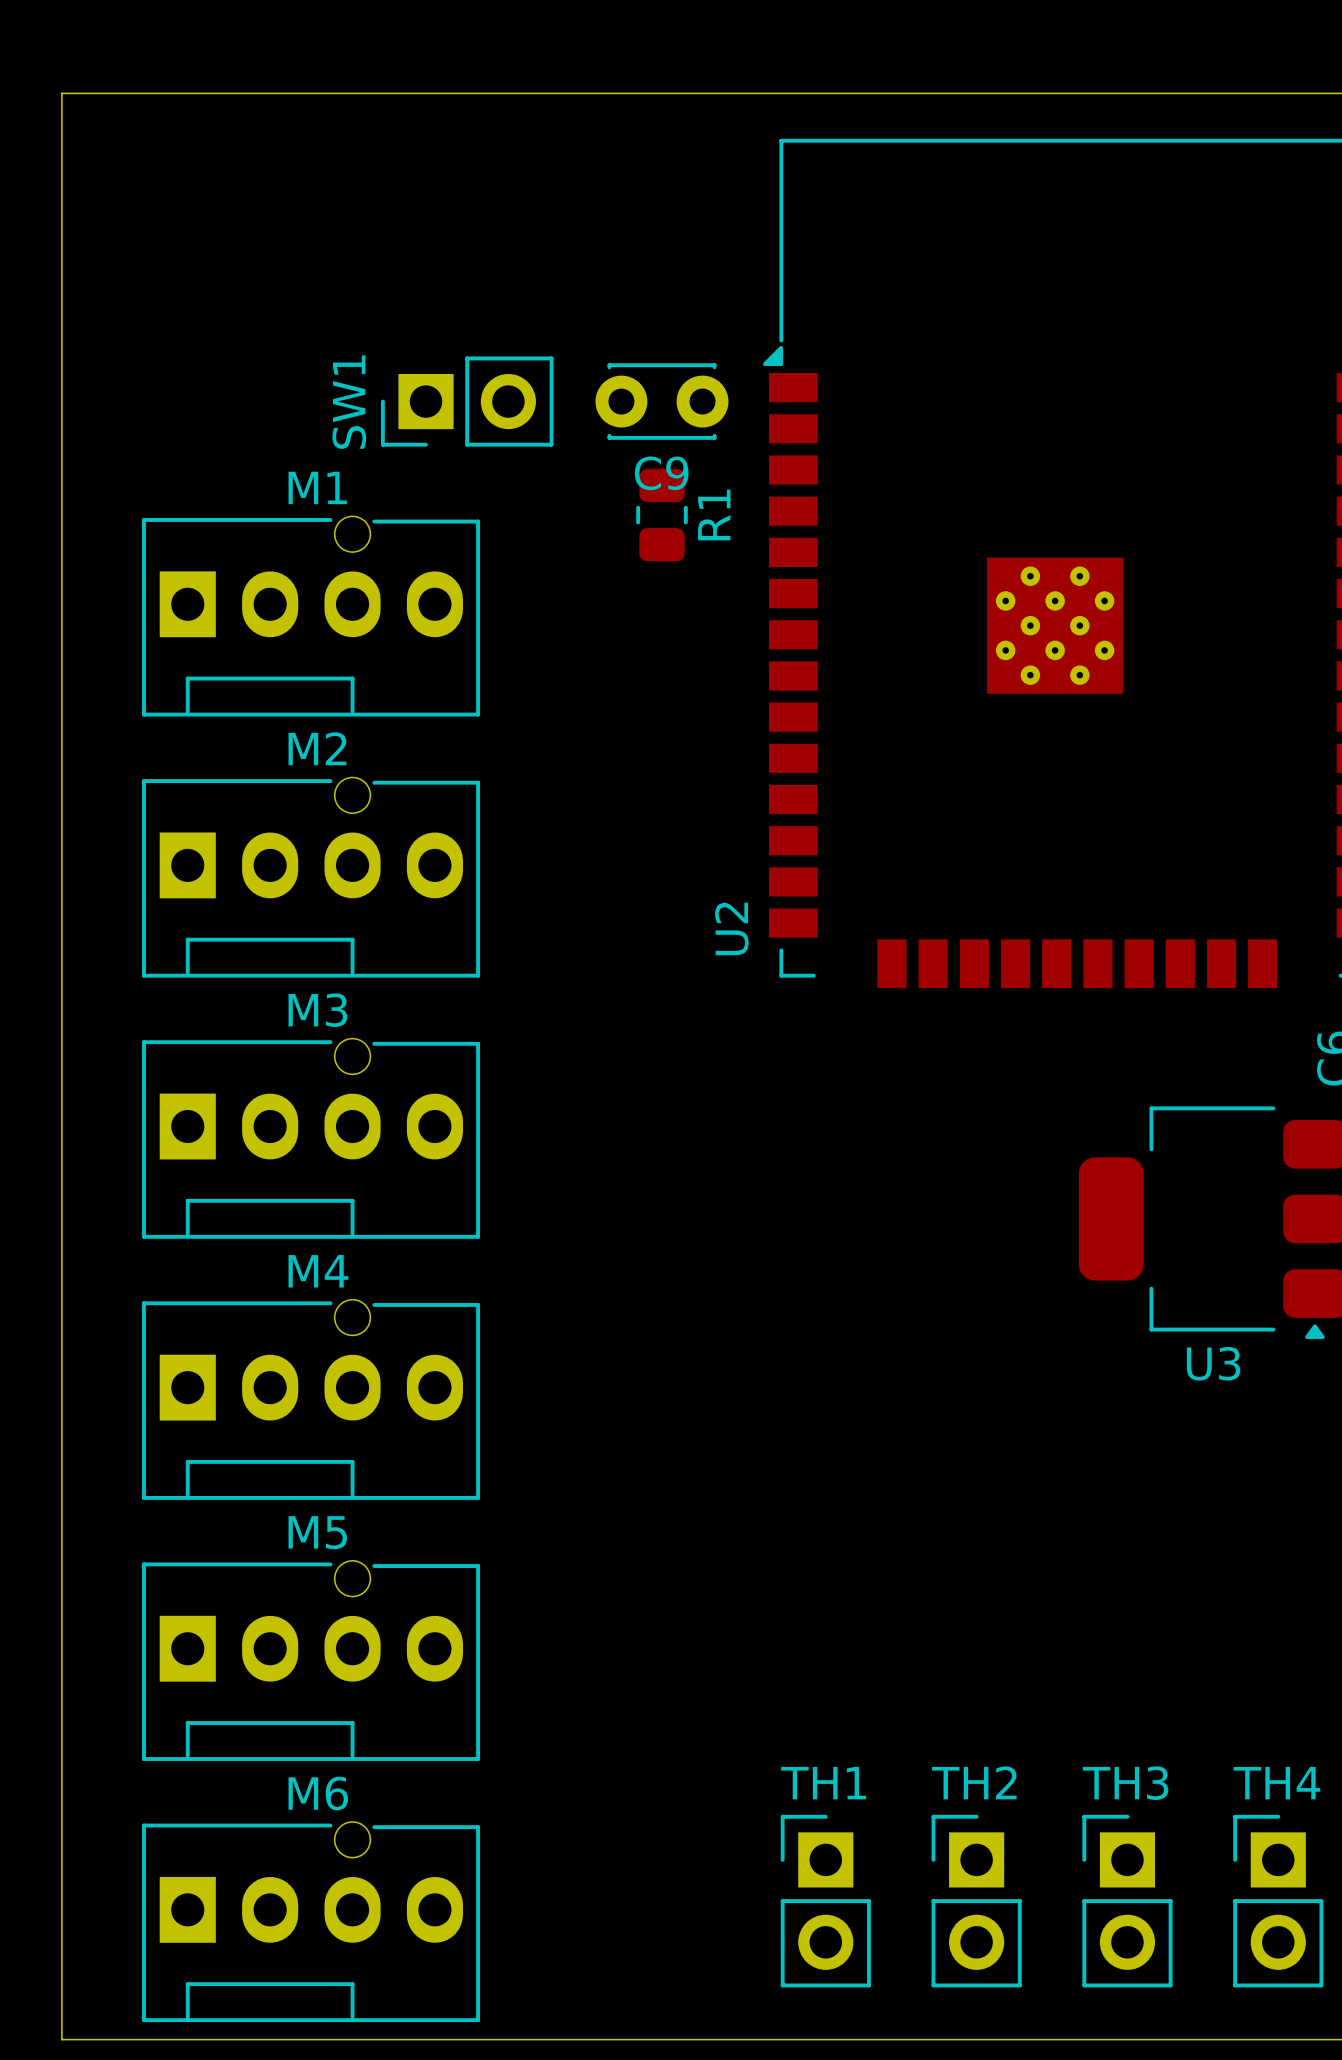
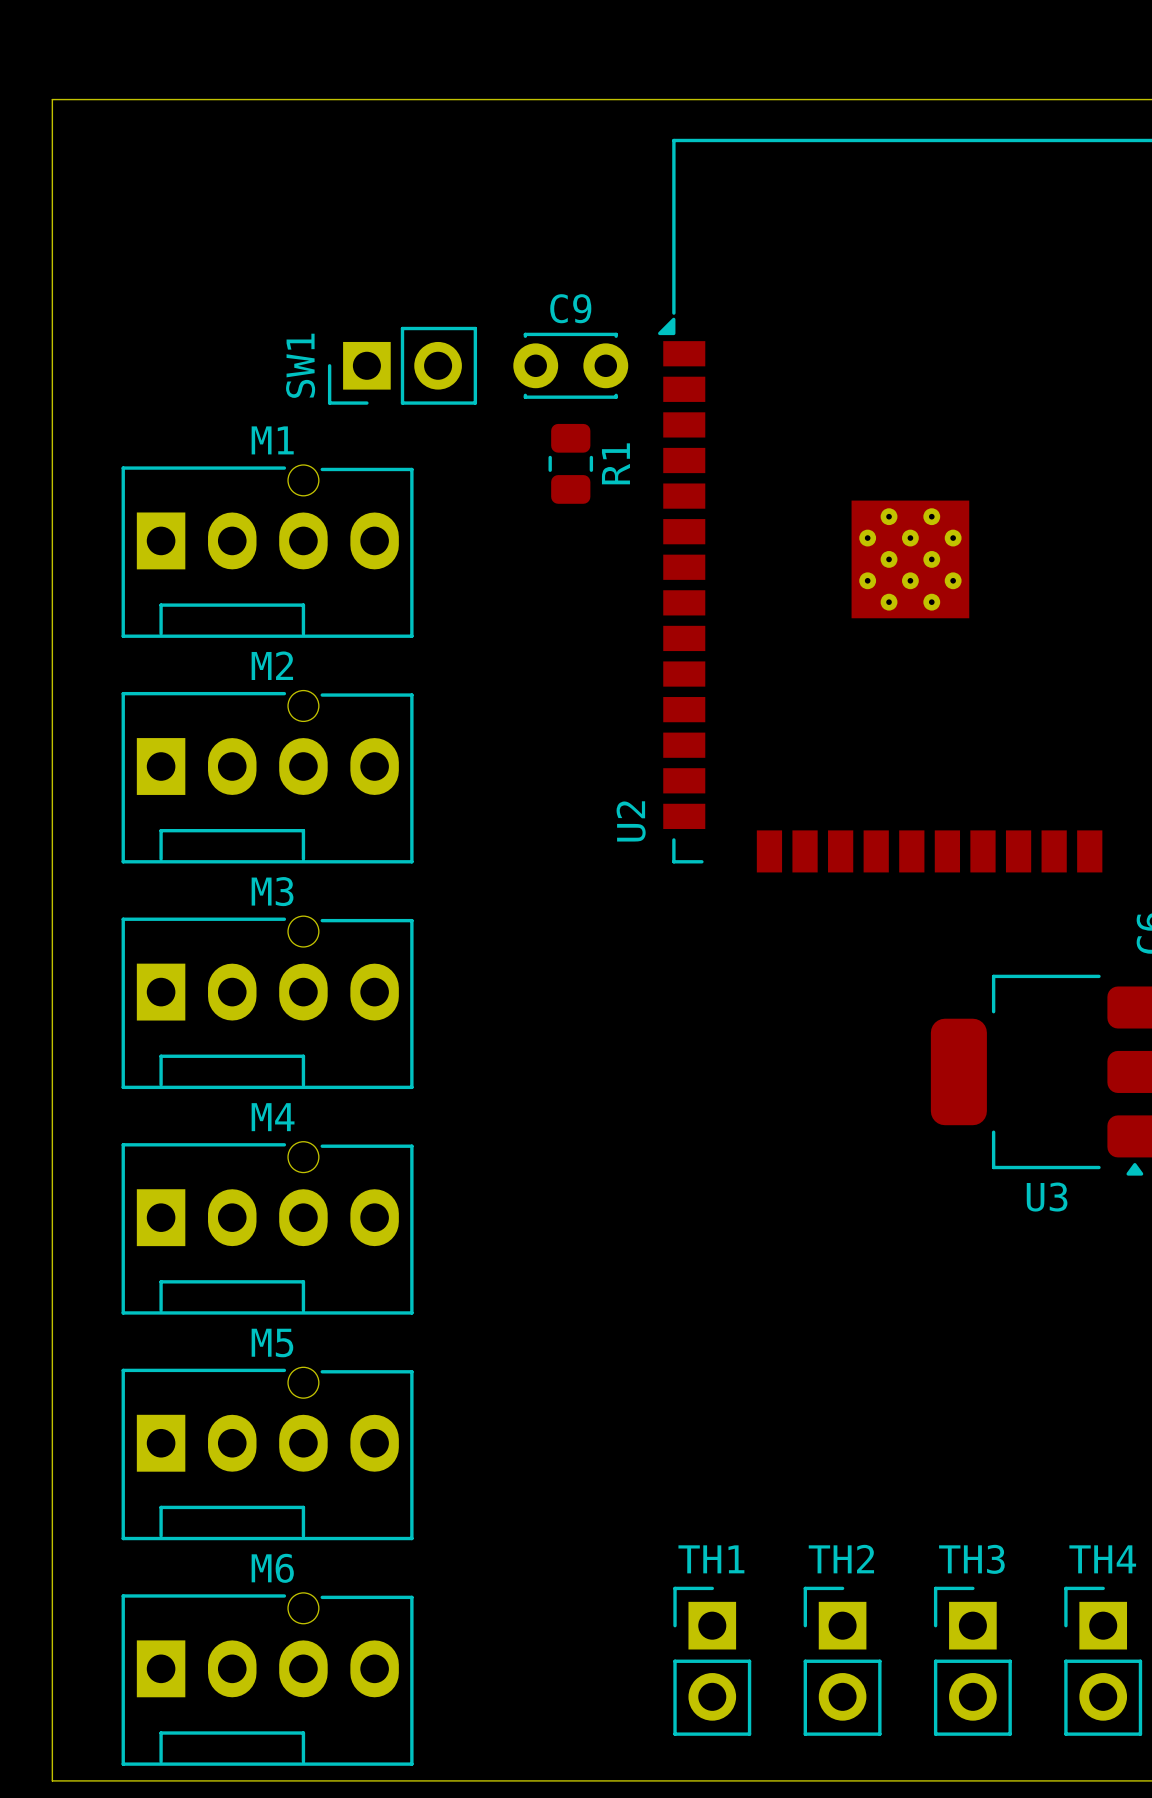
C9 name position: C9 (661, 473) -> C9 (570, 308)

